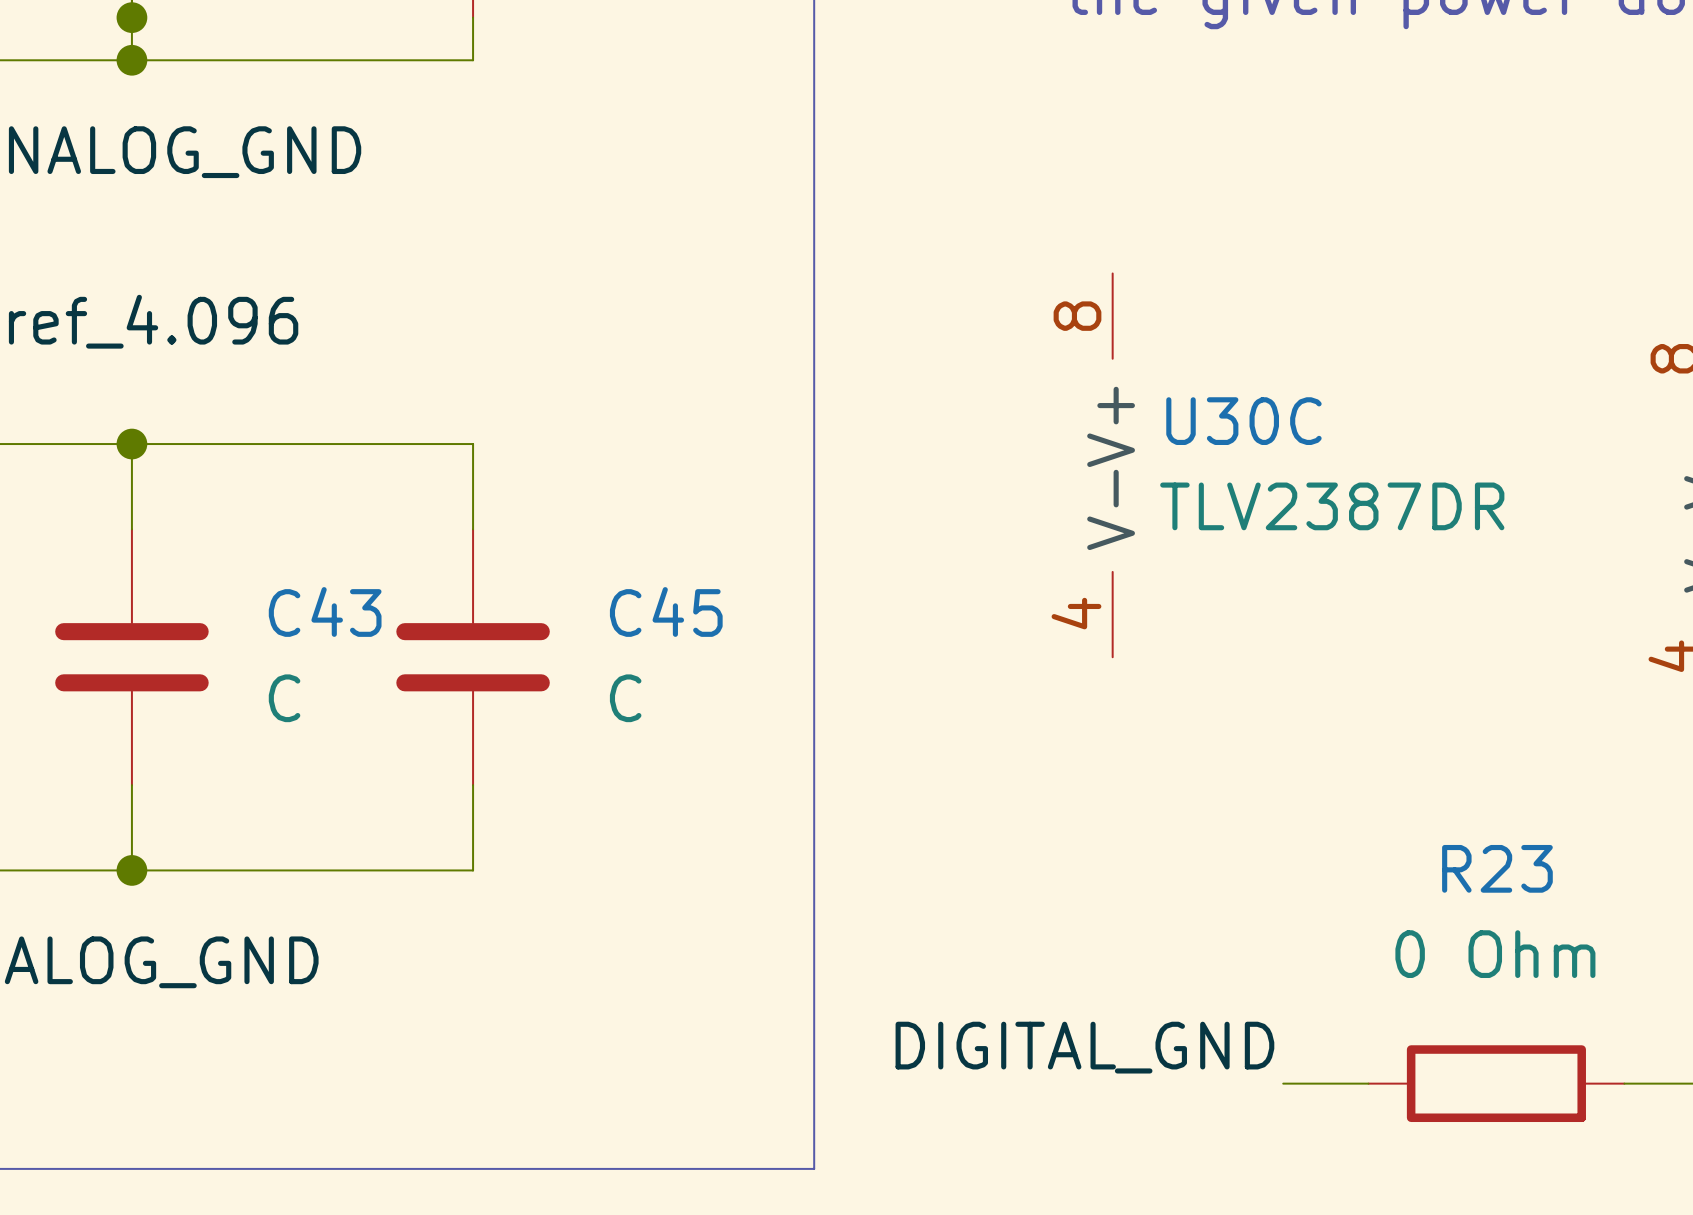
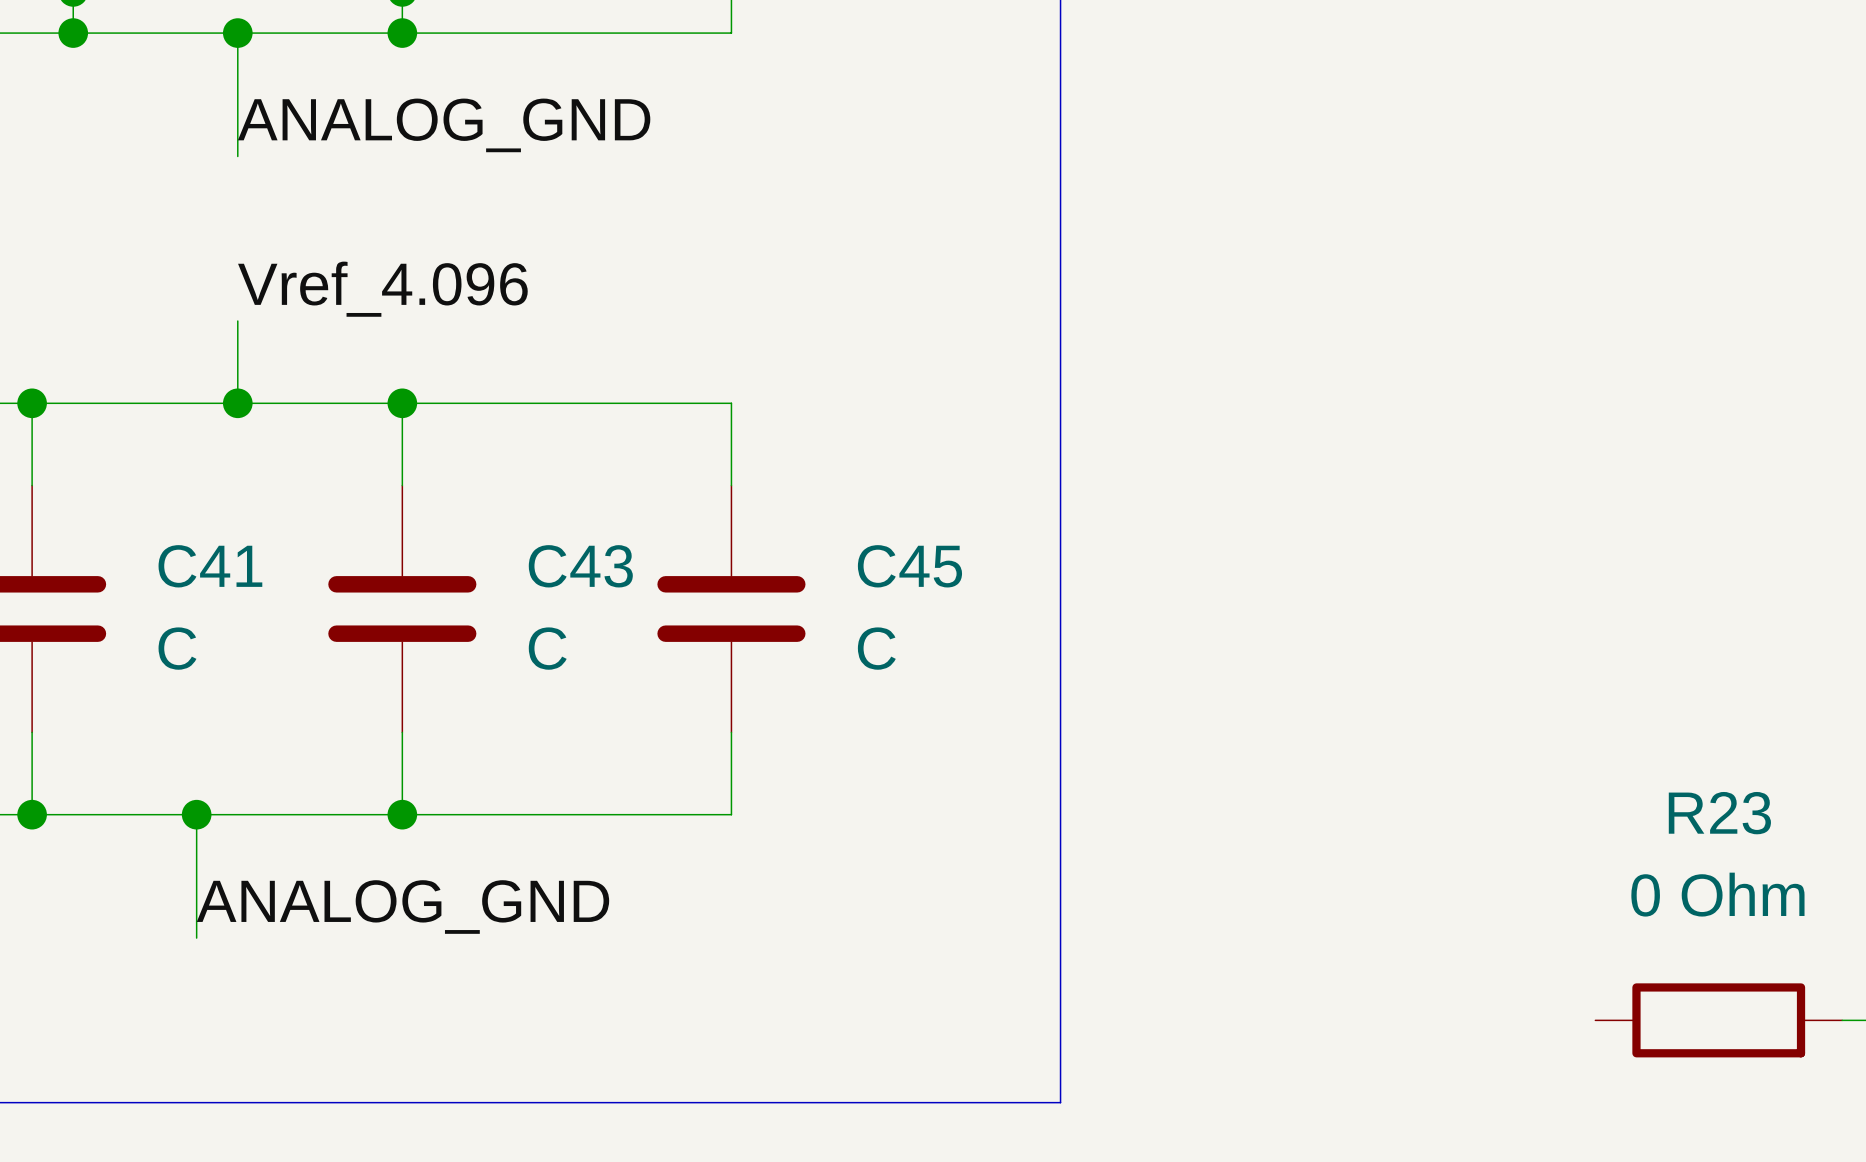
U30C: TLV2387DR (1112, 465) -> none
label: DIGITAL_GND (1084, 1047) -> none
wire: (1283, 1083) (1368, 1083) -> none

